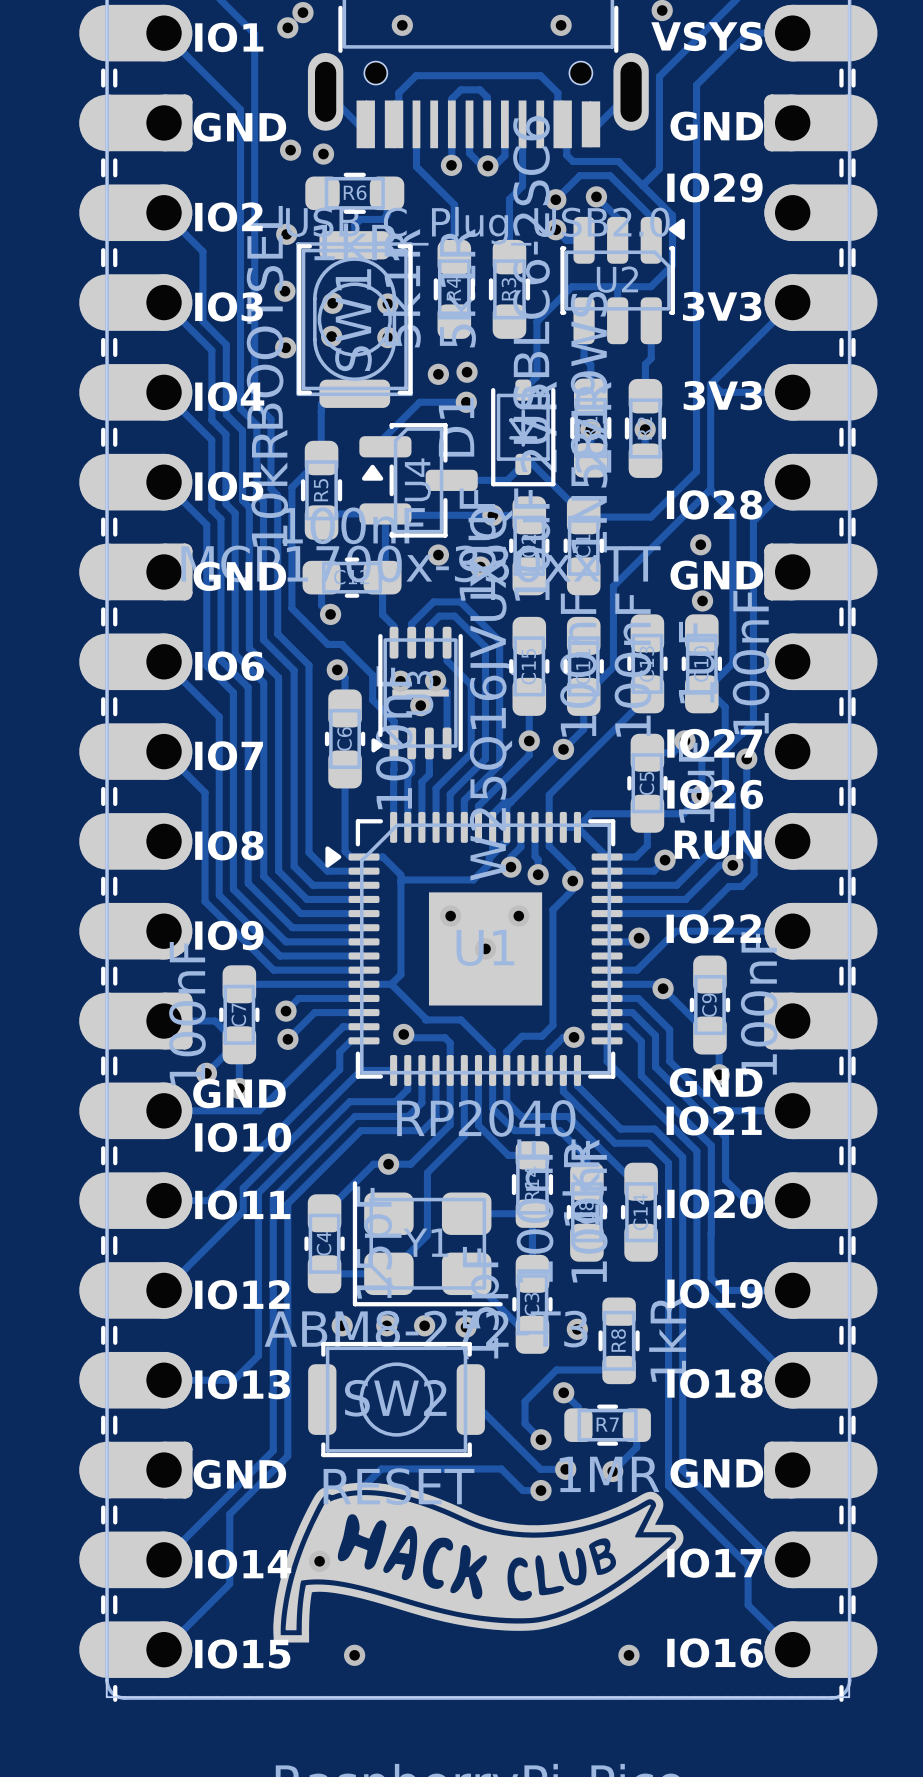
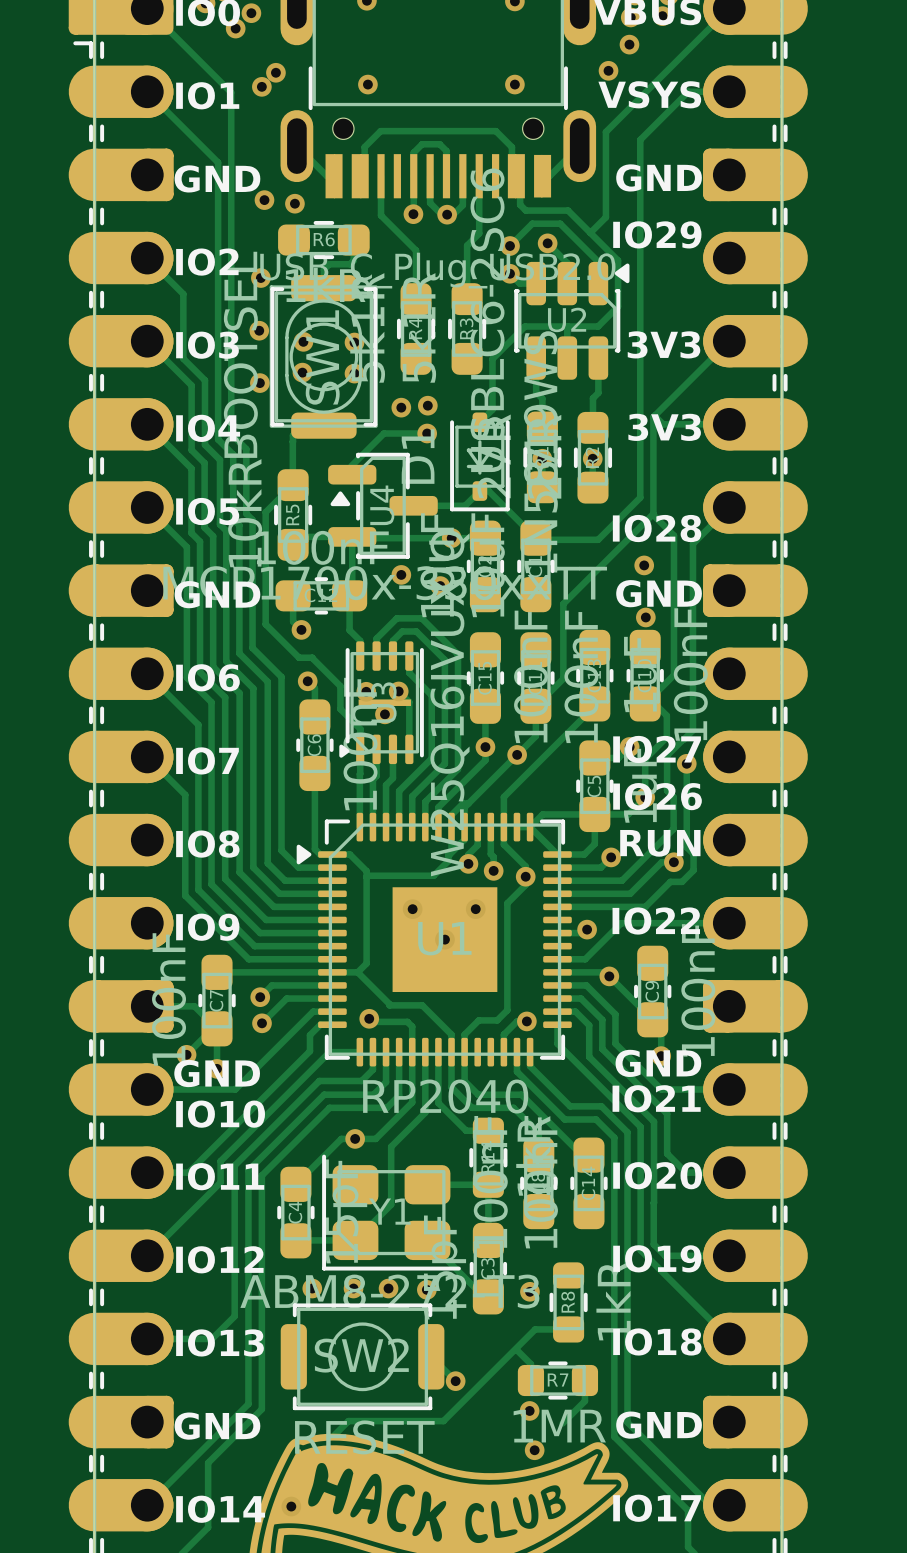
track: (583, 1369) (556, 1369) (525, 1401) (525, 1423) (540, 1439) -> (535, 1329) (443, 1421)
via: (563, 1392) -> none
track: (497, 1425) (540, 1469) (565, 1469) -> none
via: none -> (455, 1381)
via: (540, 1439) -> none
track: (484, 1469) (501, 1469) (522, 1490) (545, 1490) -> none
via position: (565, 1469) -> (529, 1410)
via: (612, 1471) -> none
via: (540, 1490) -> none
via: none -> (534, 1450)

